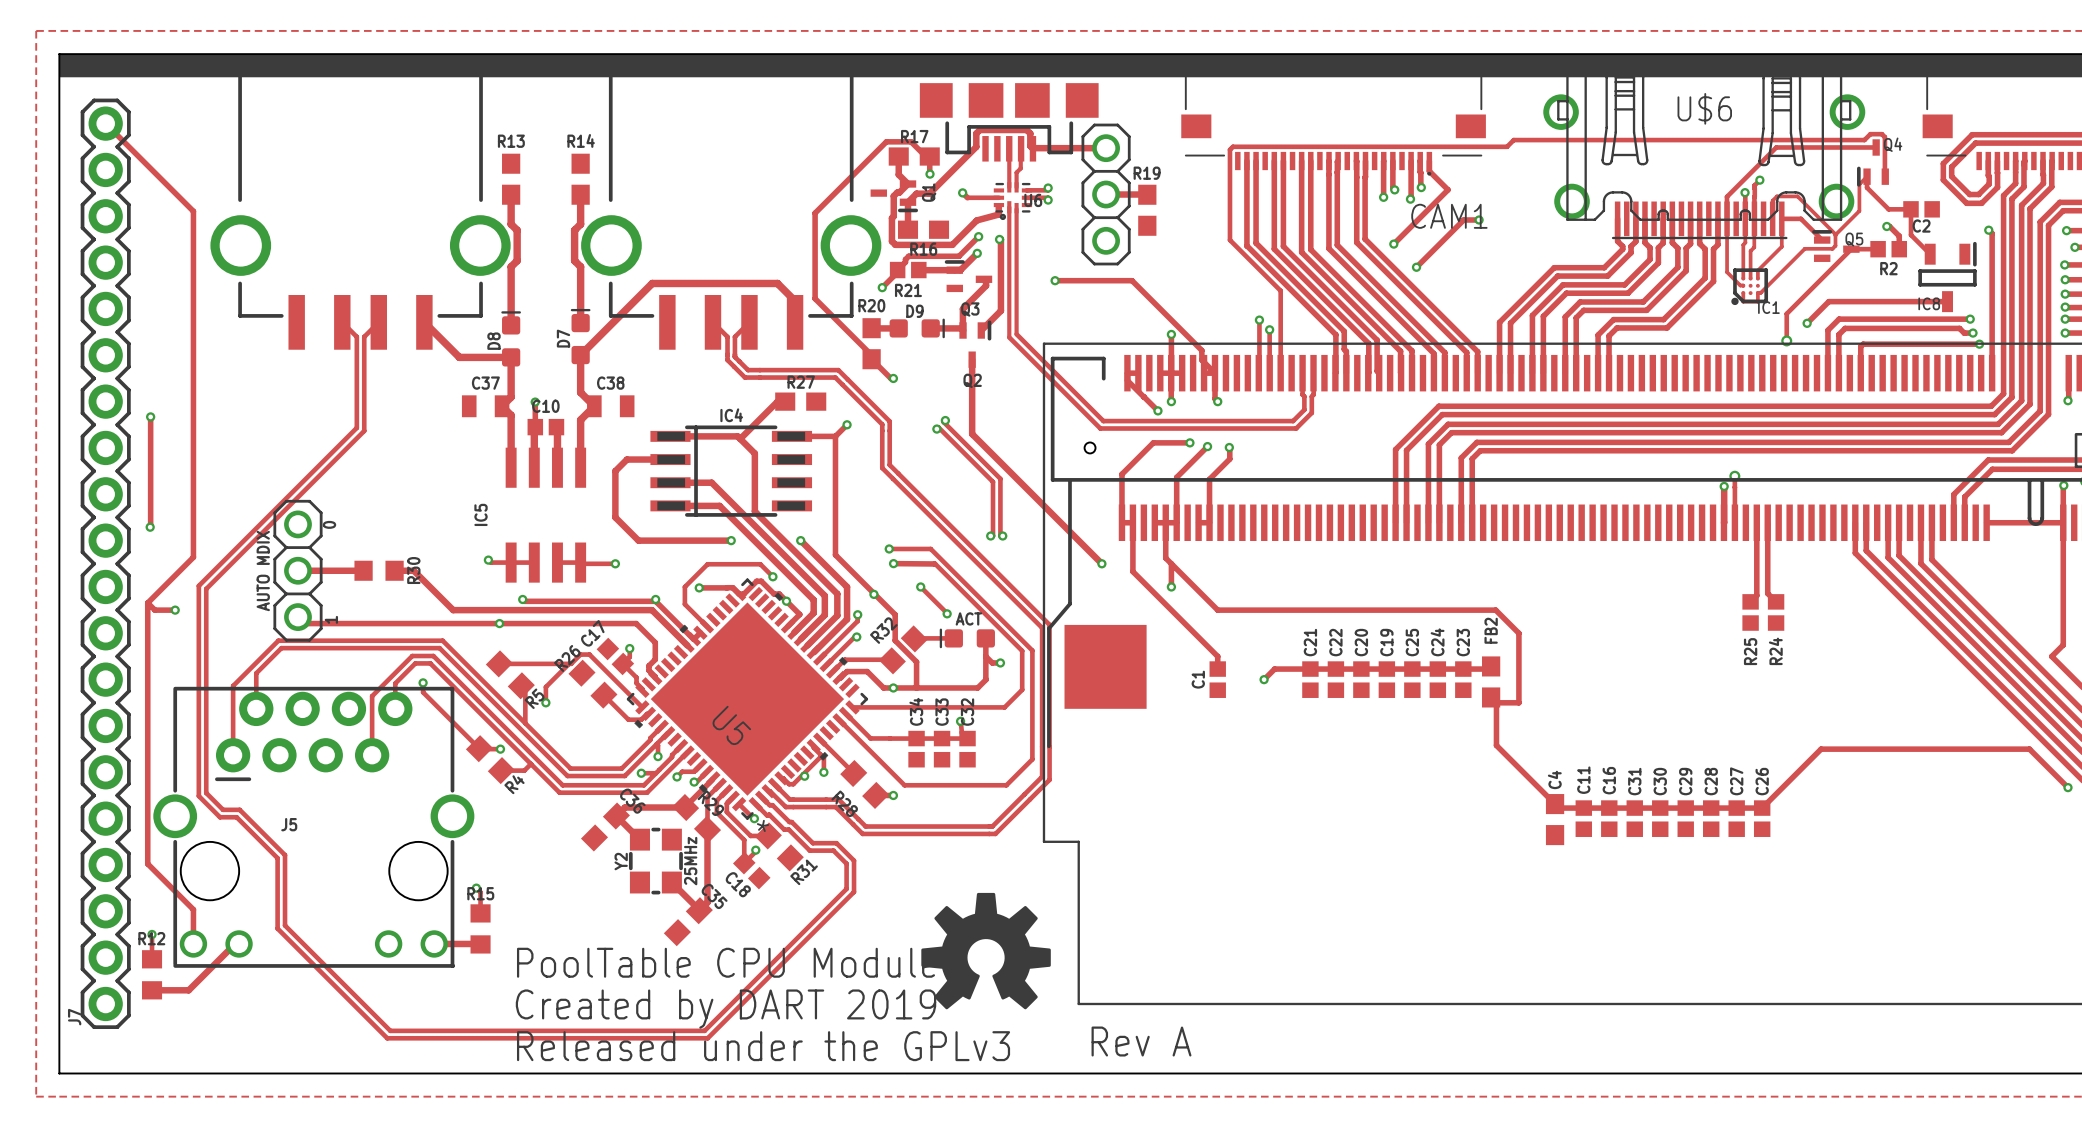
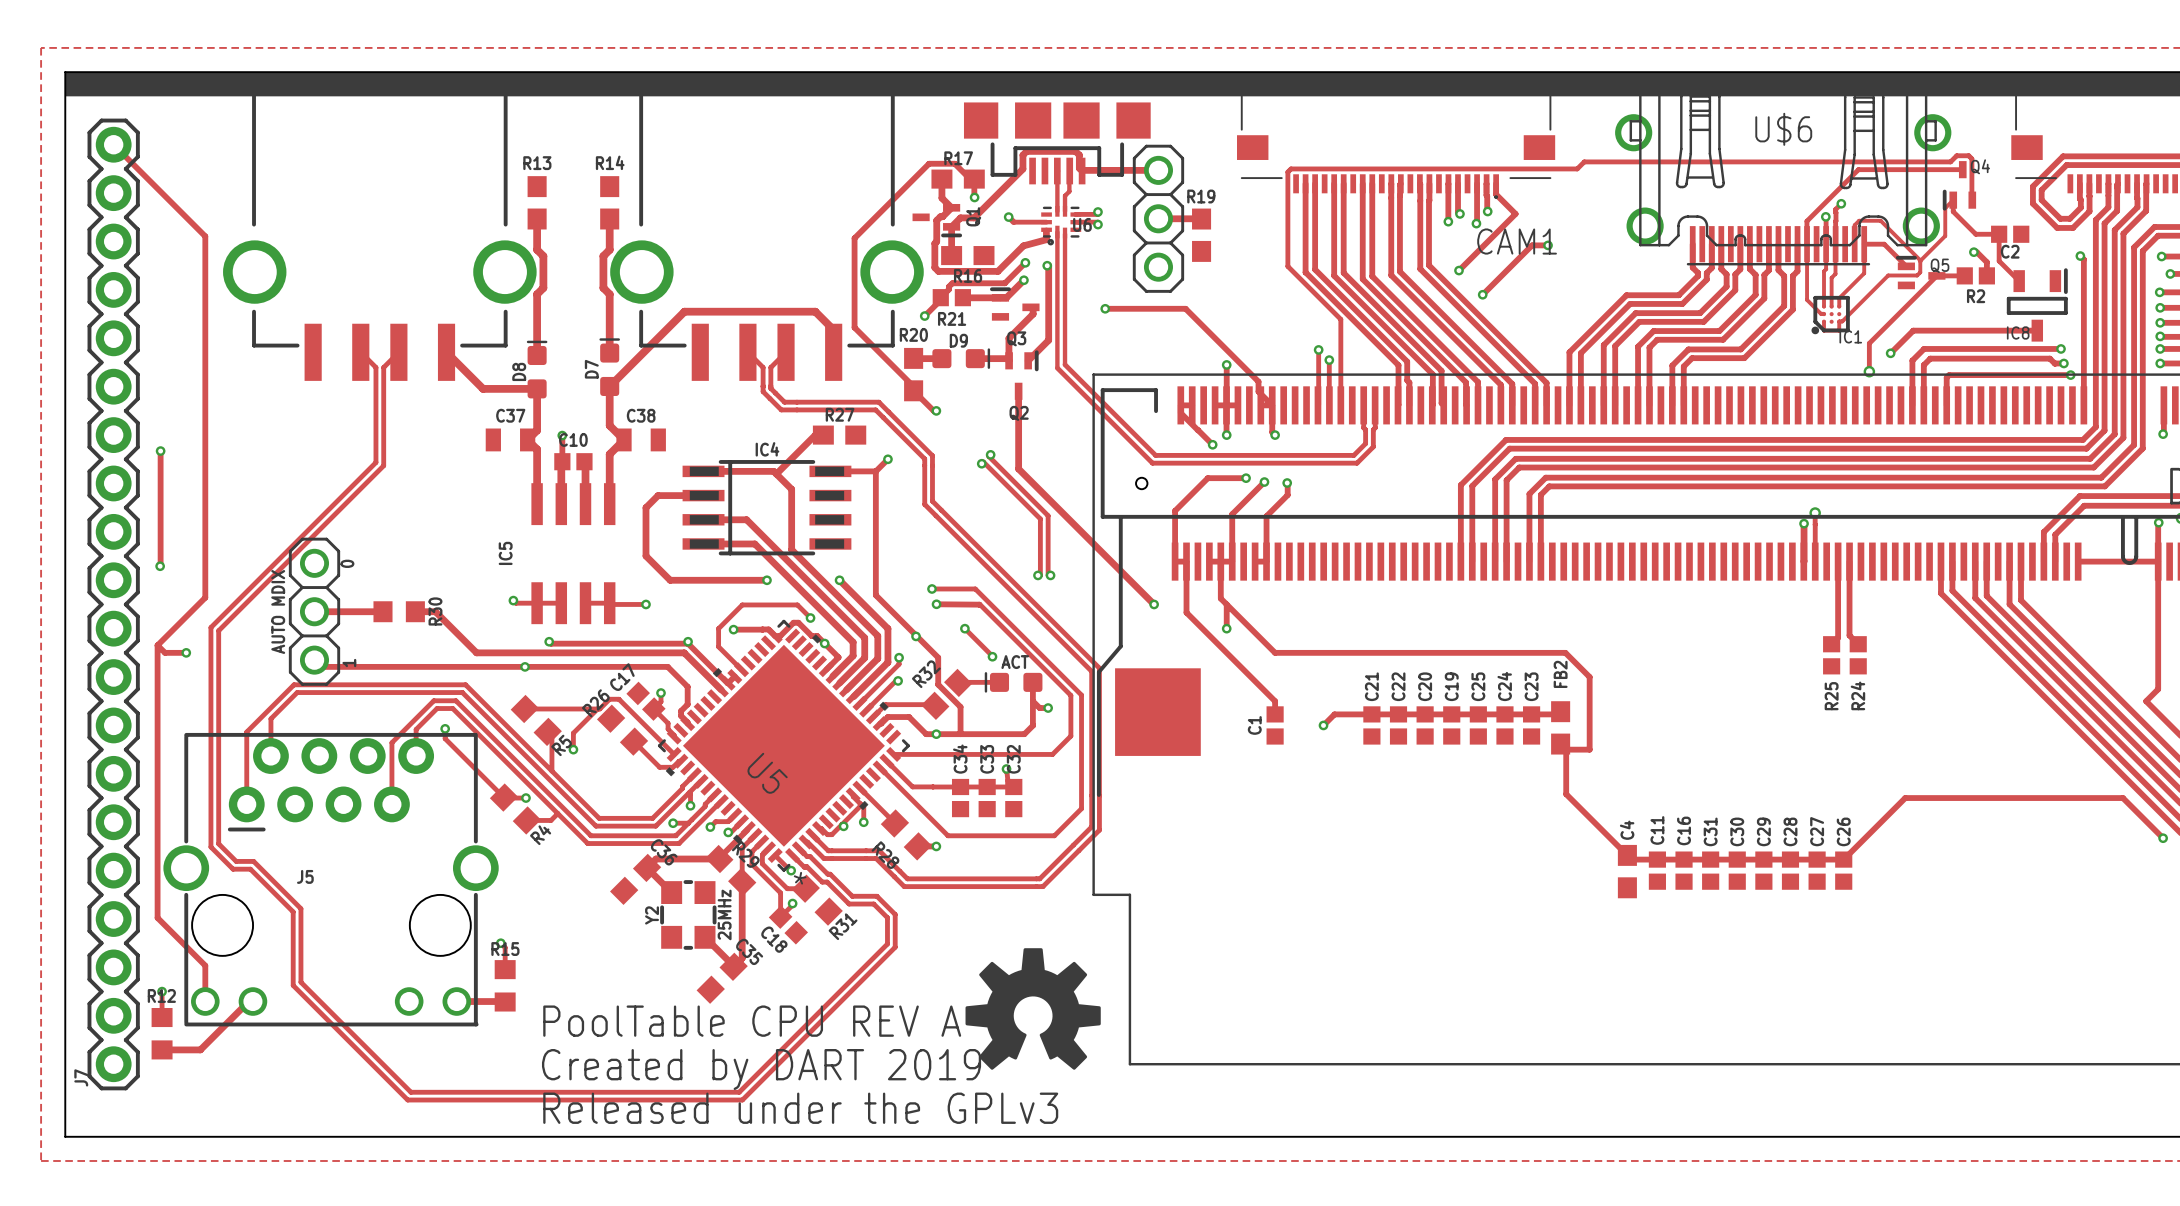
text: PoolTable CPU Module (726, 962) -> PoolTable CPU REV A (752, 1021)
text: Rev A (1141, 1041) -> none

